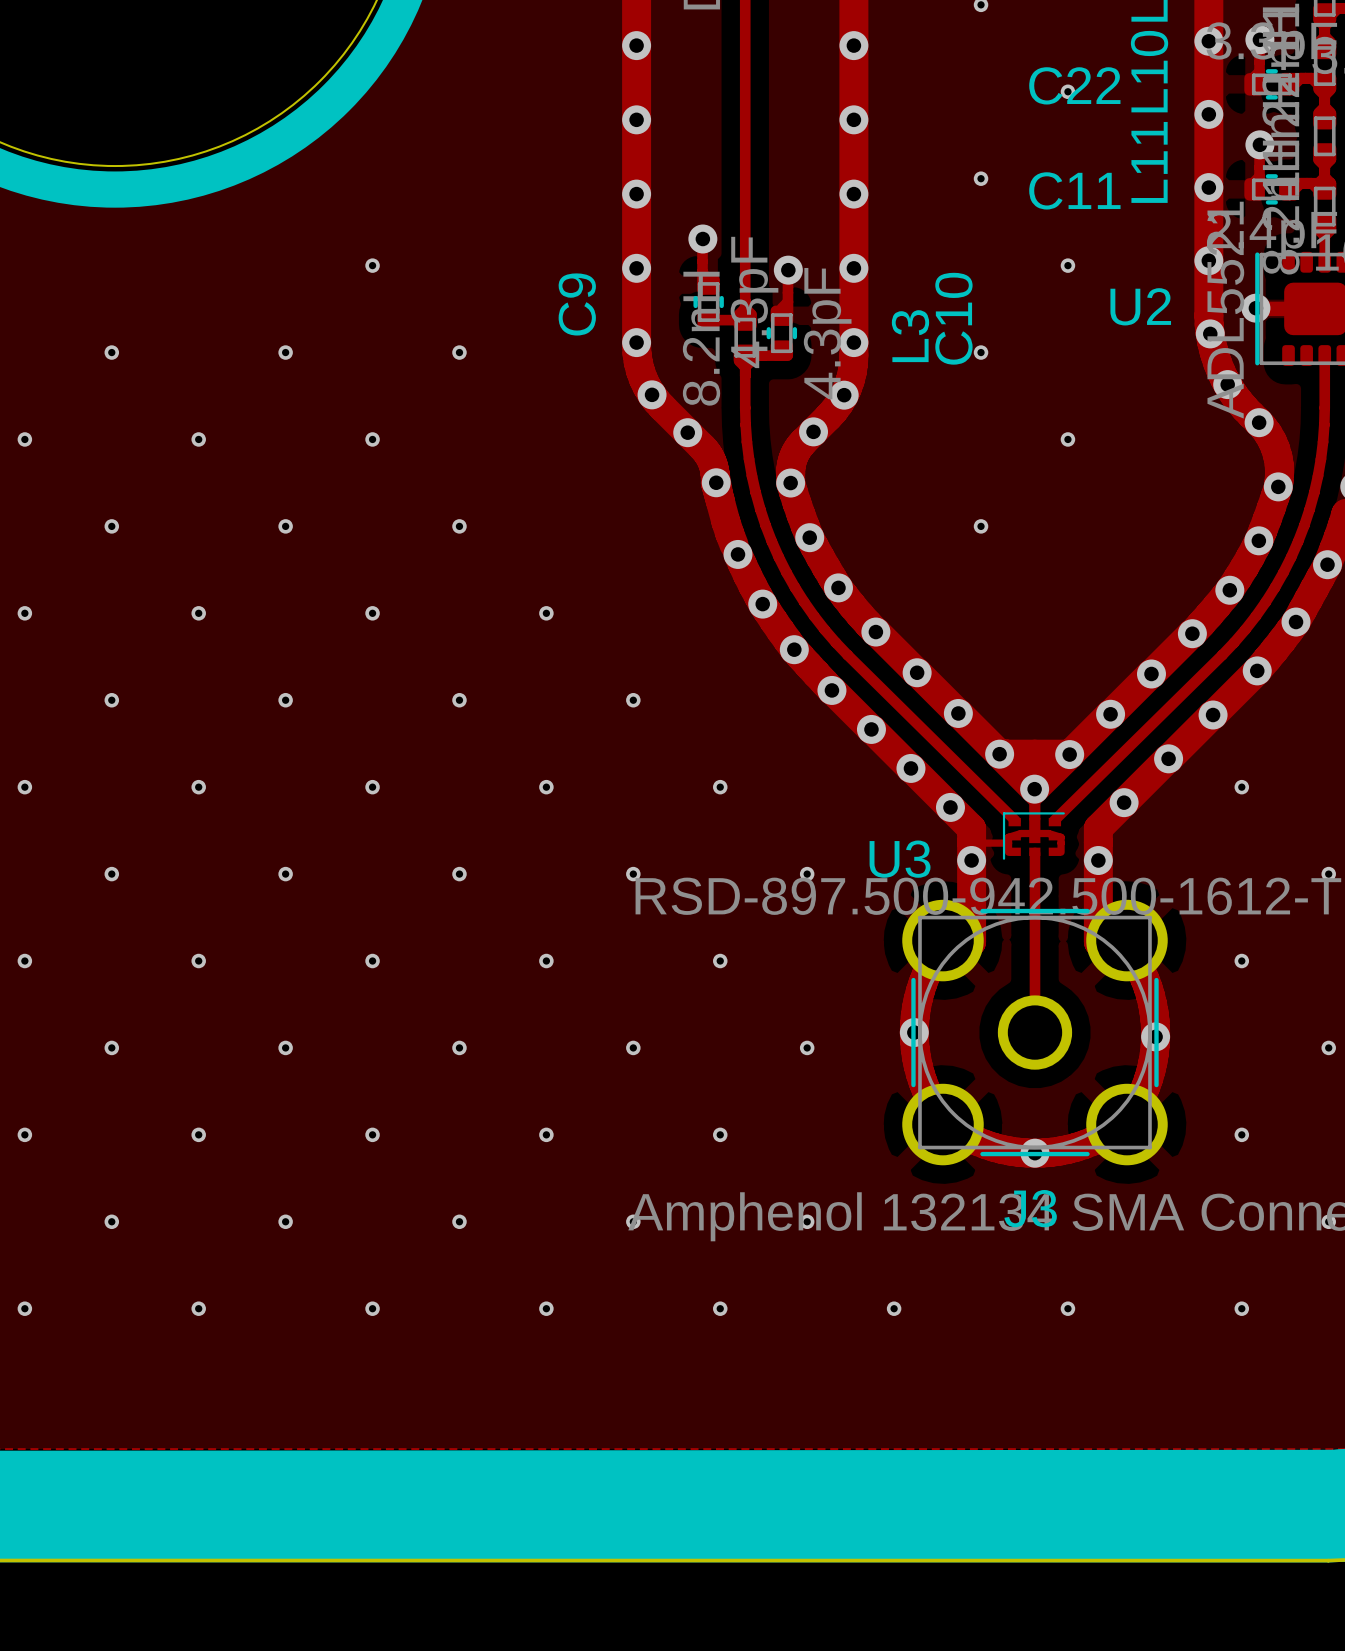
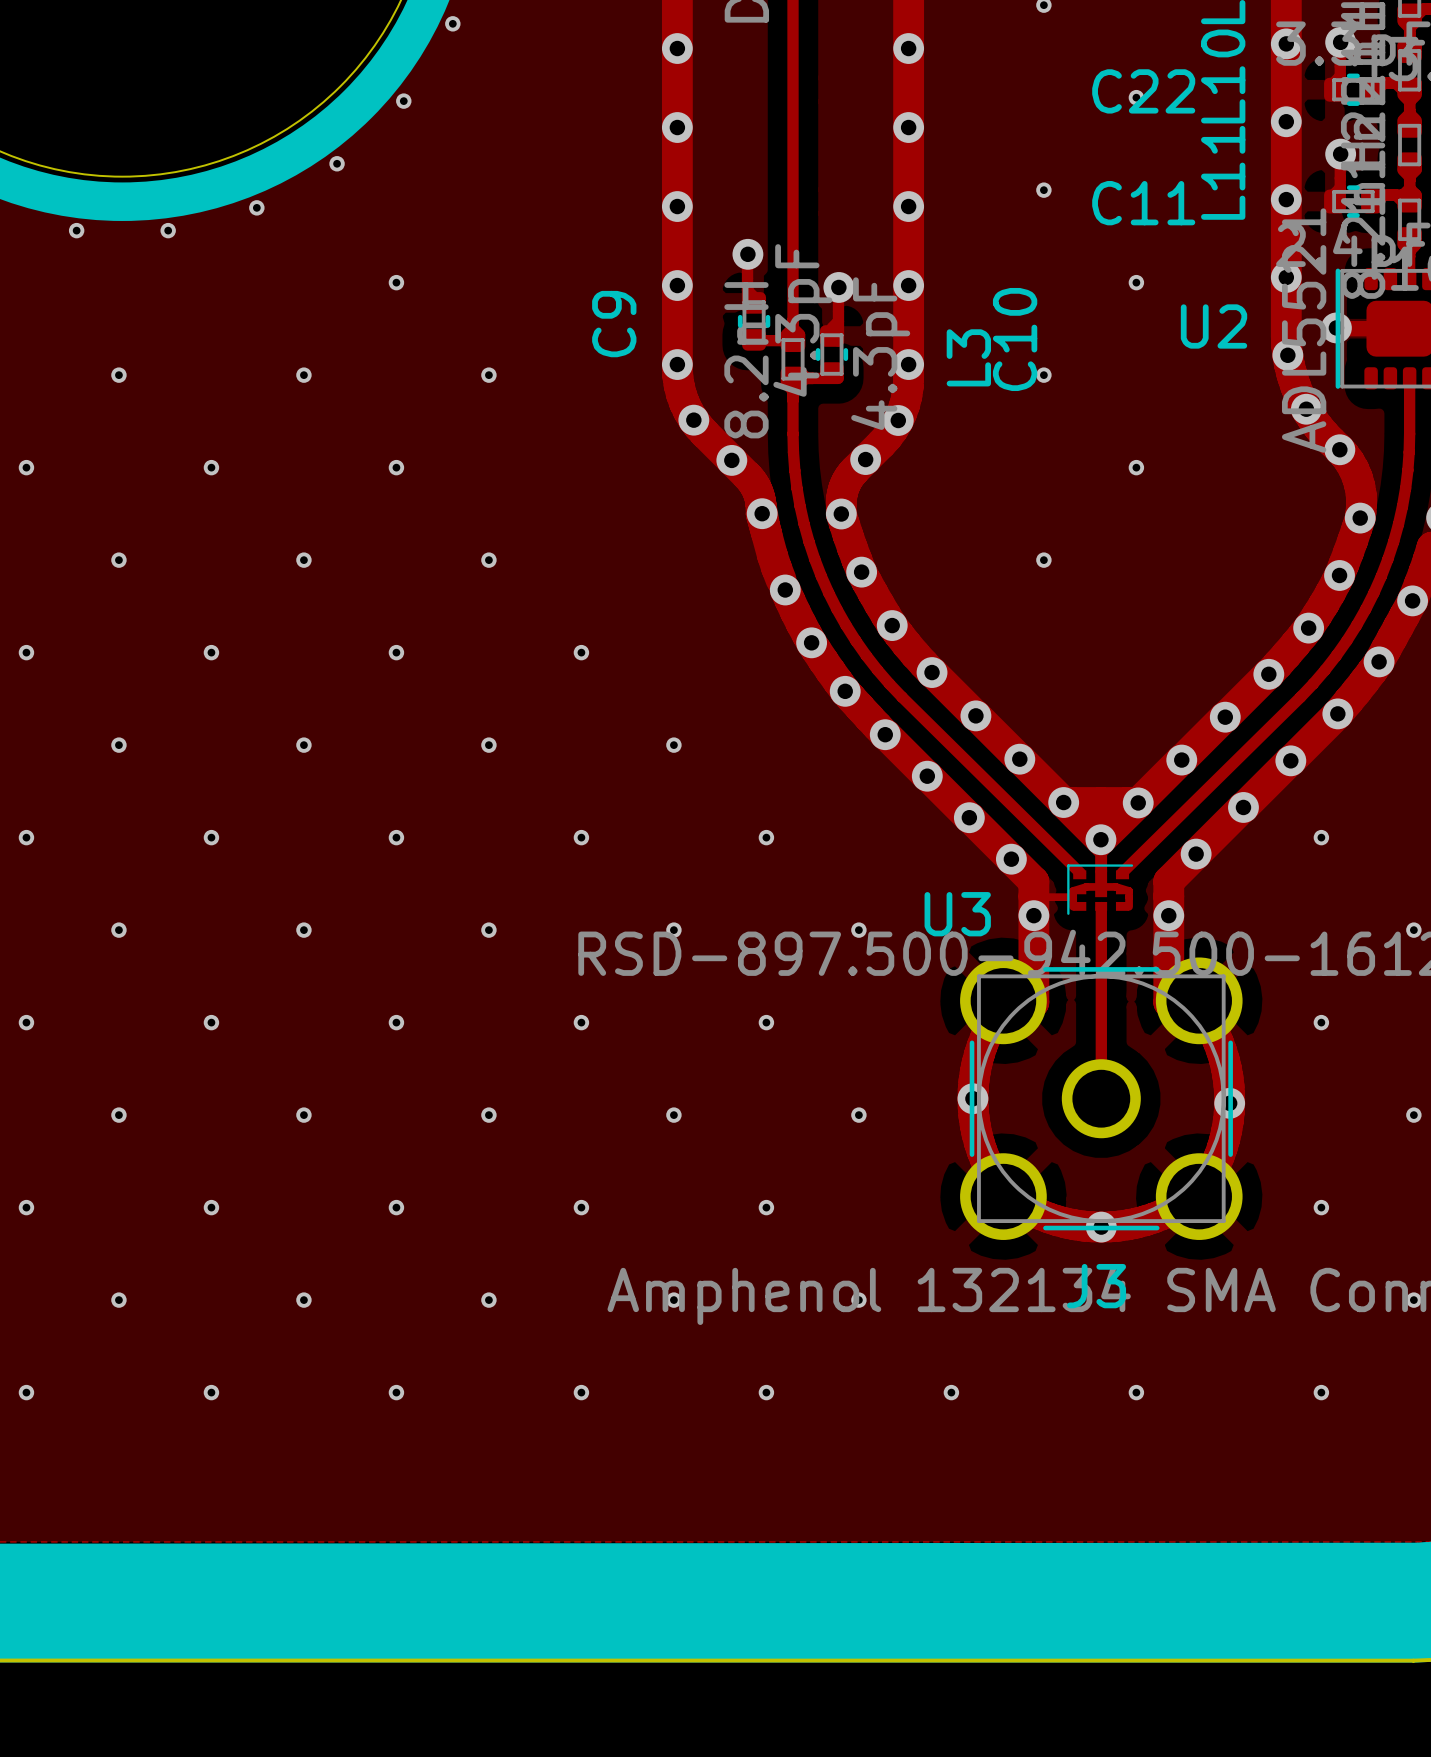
via: none -> (452, 23)
via: none -> (403, 101)
via: none -> (337, 163)
via: none -> (256, 207)
via: none -> (76, 230)
via: none -> (168, 230)

